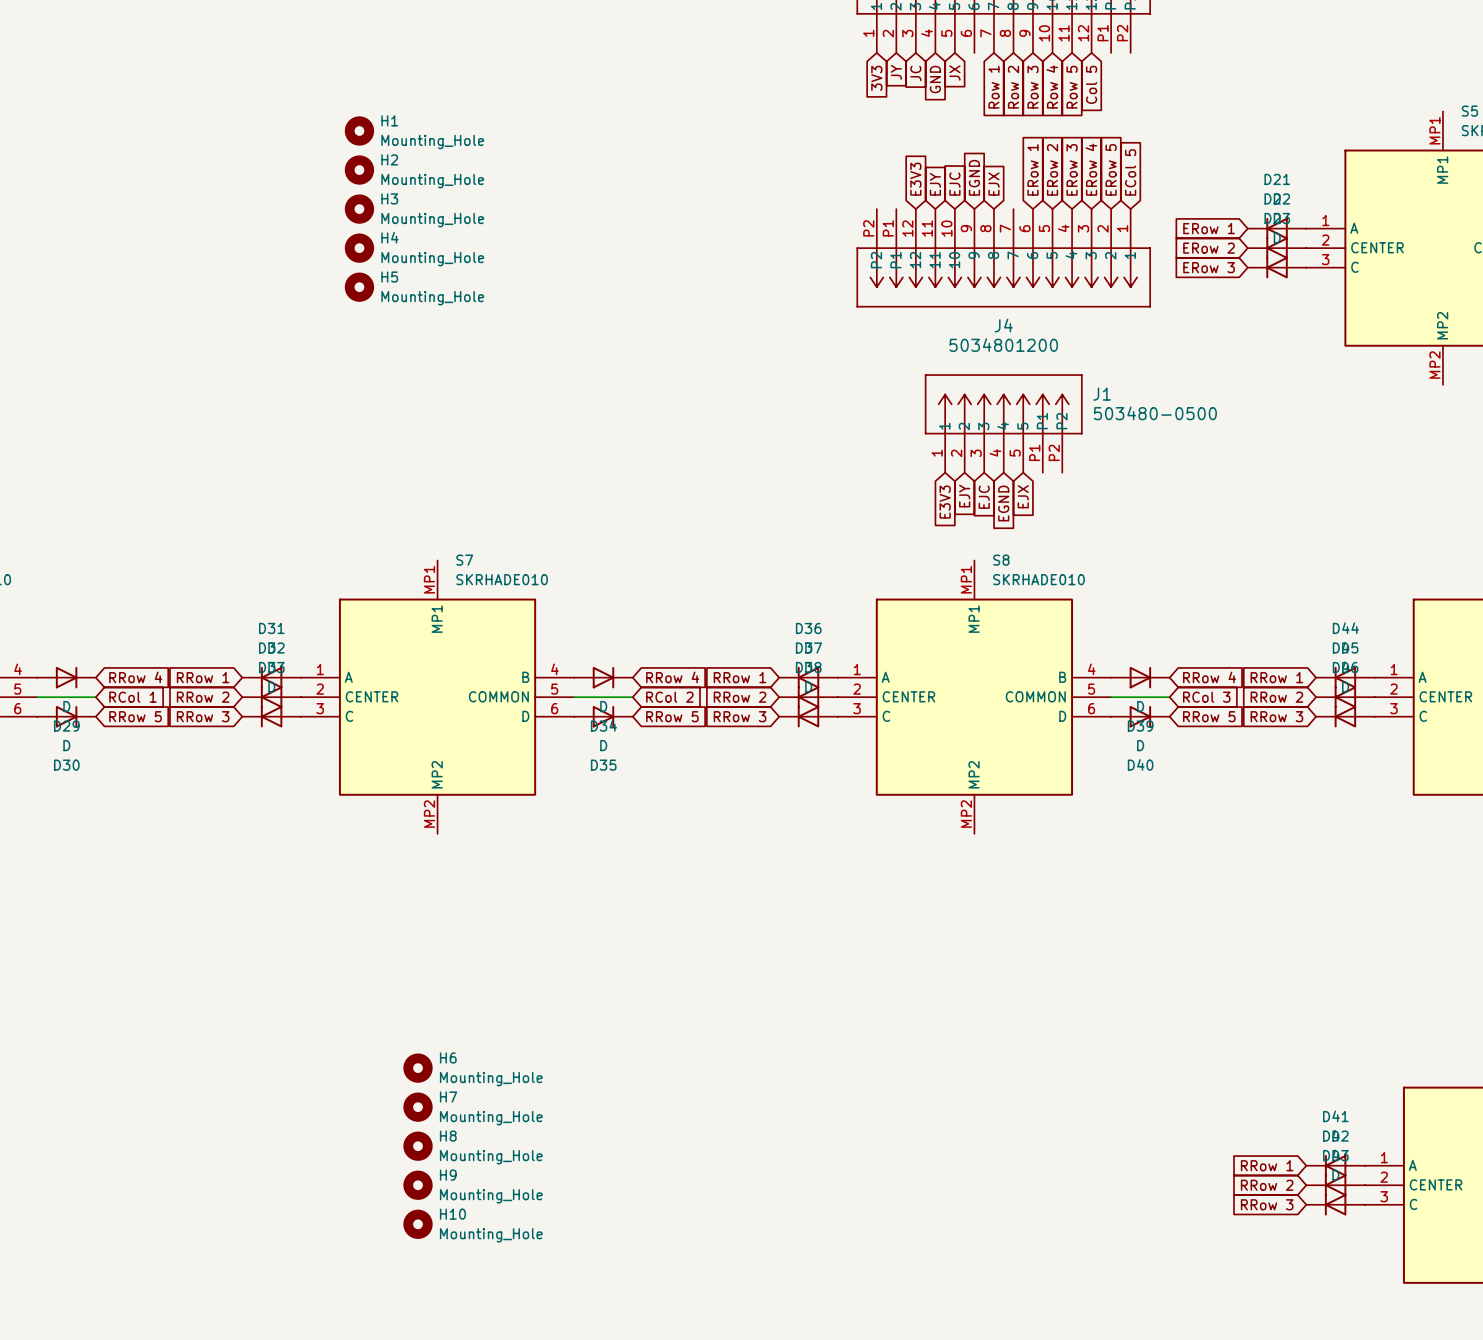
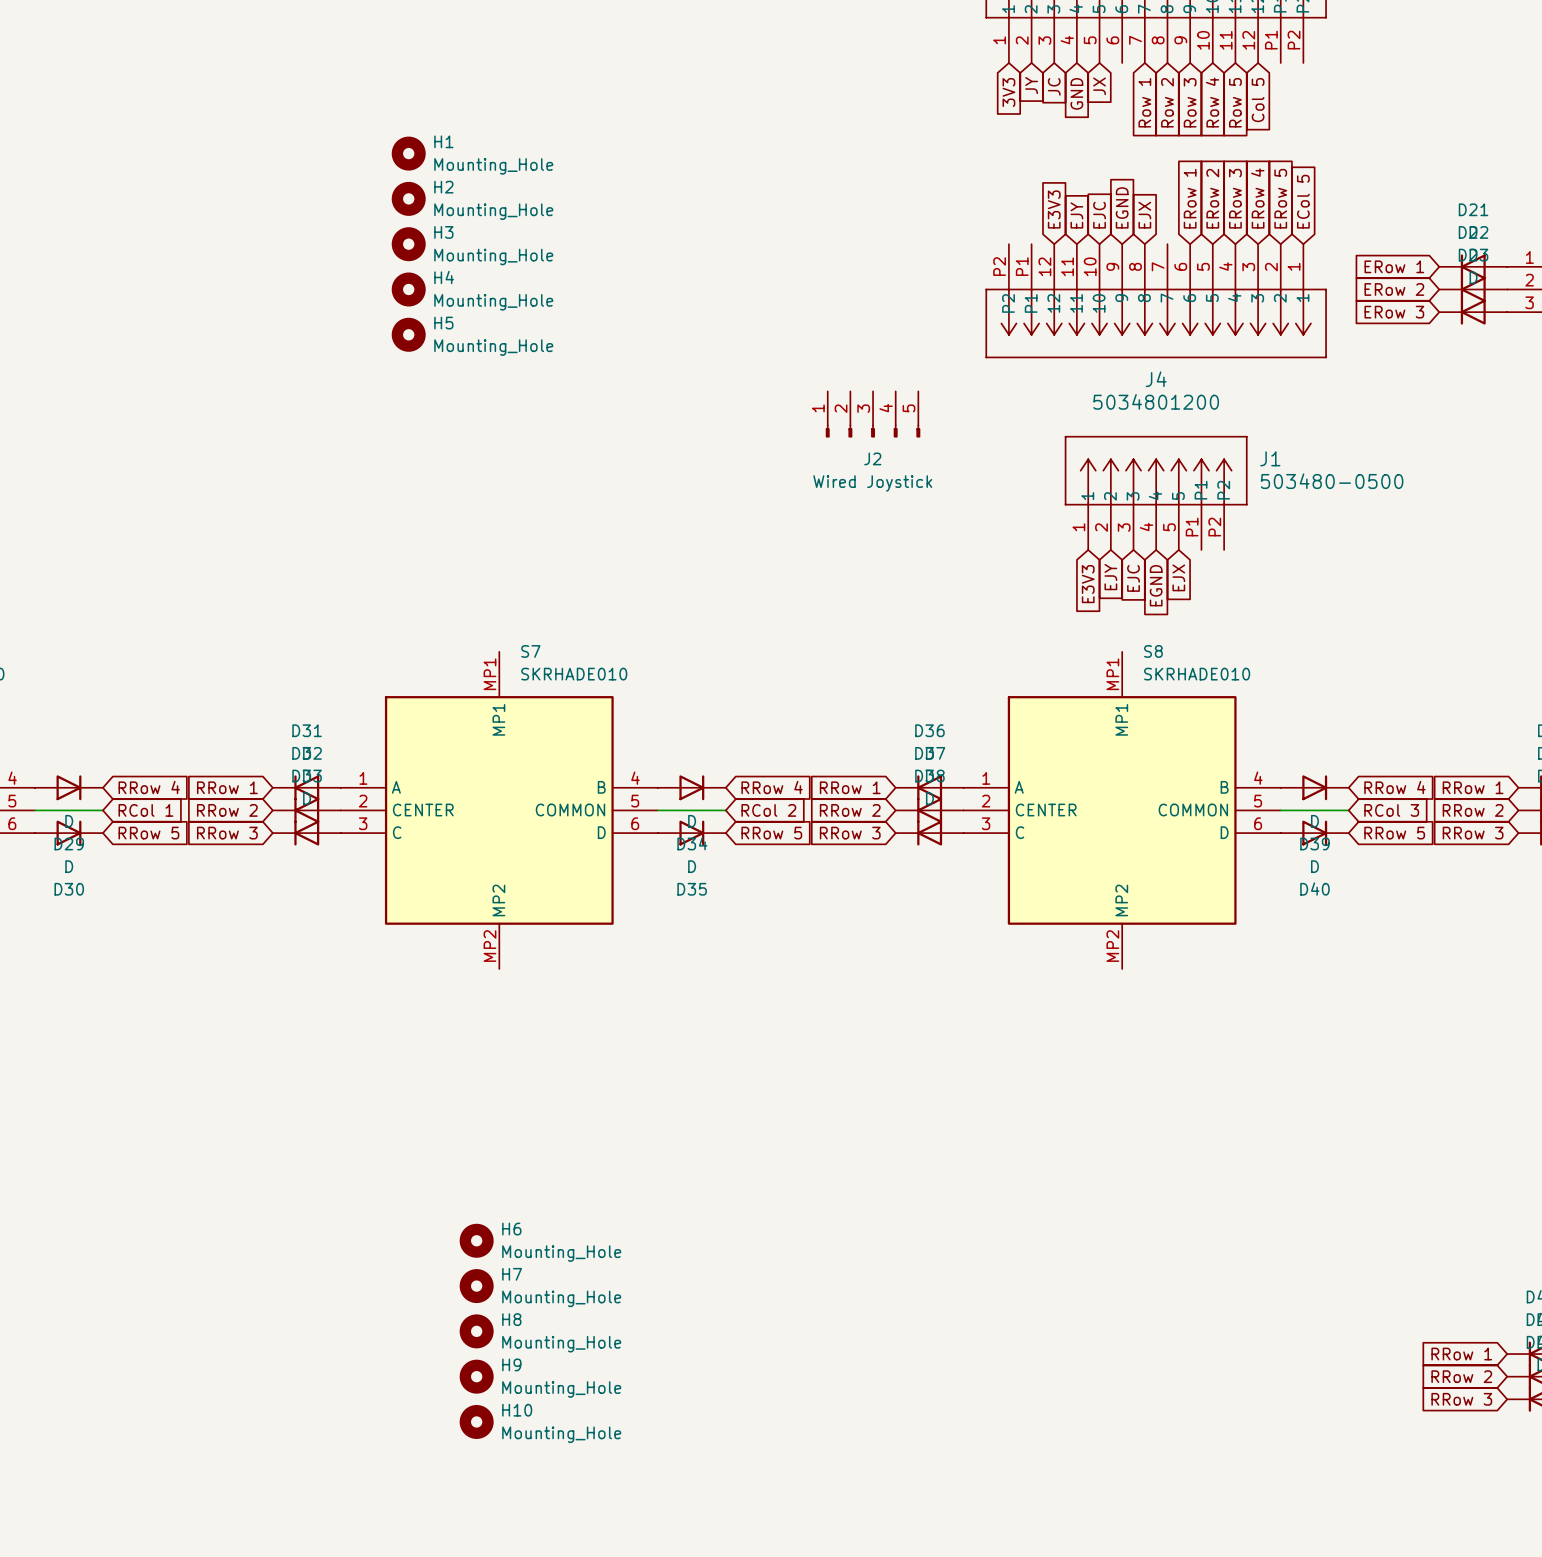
J2: none -> Wired Joystick (873, 414)

